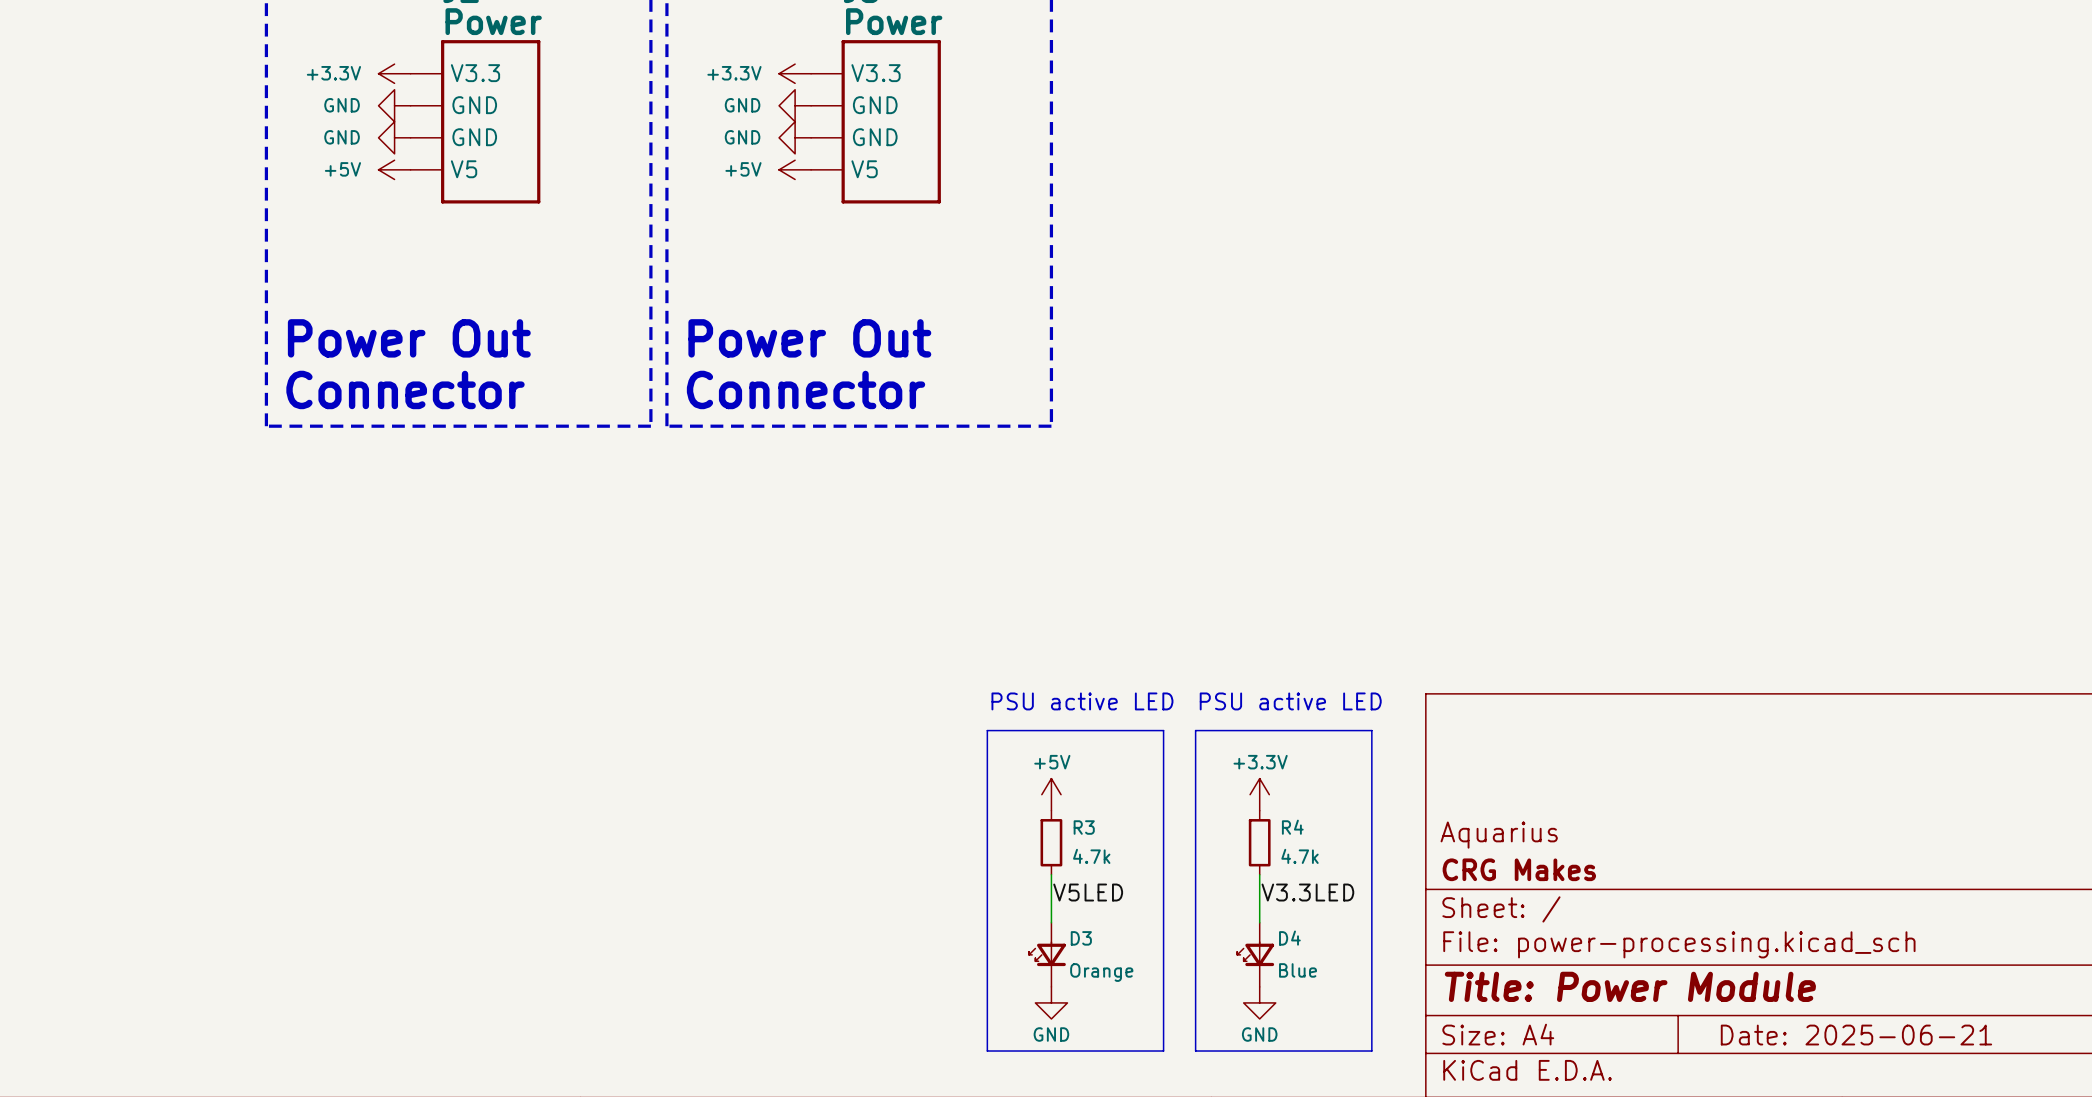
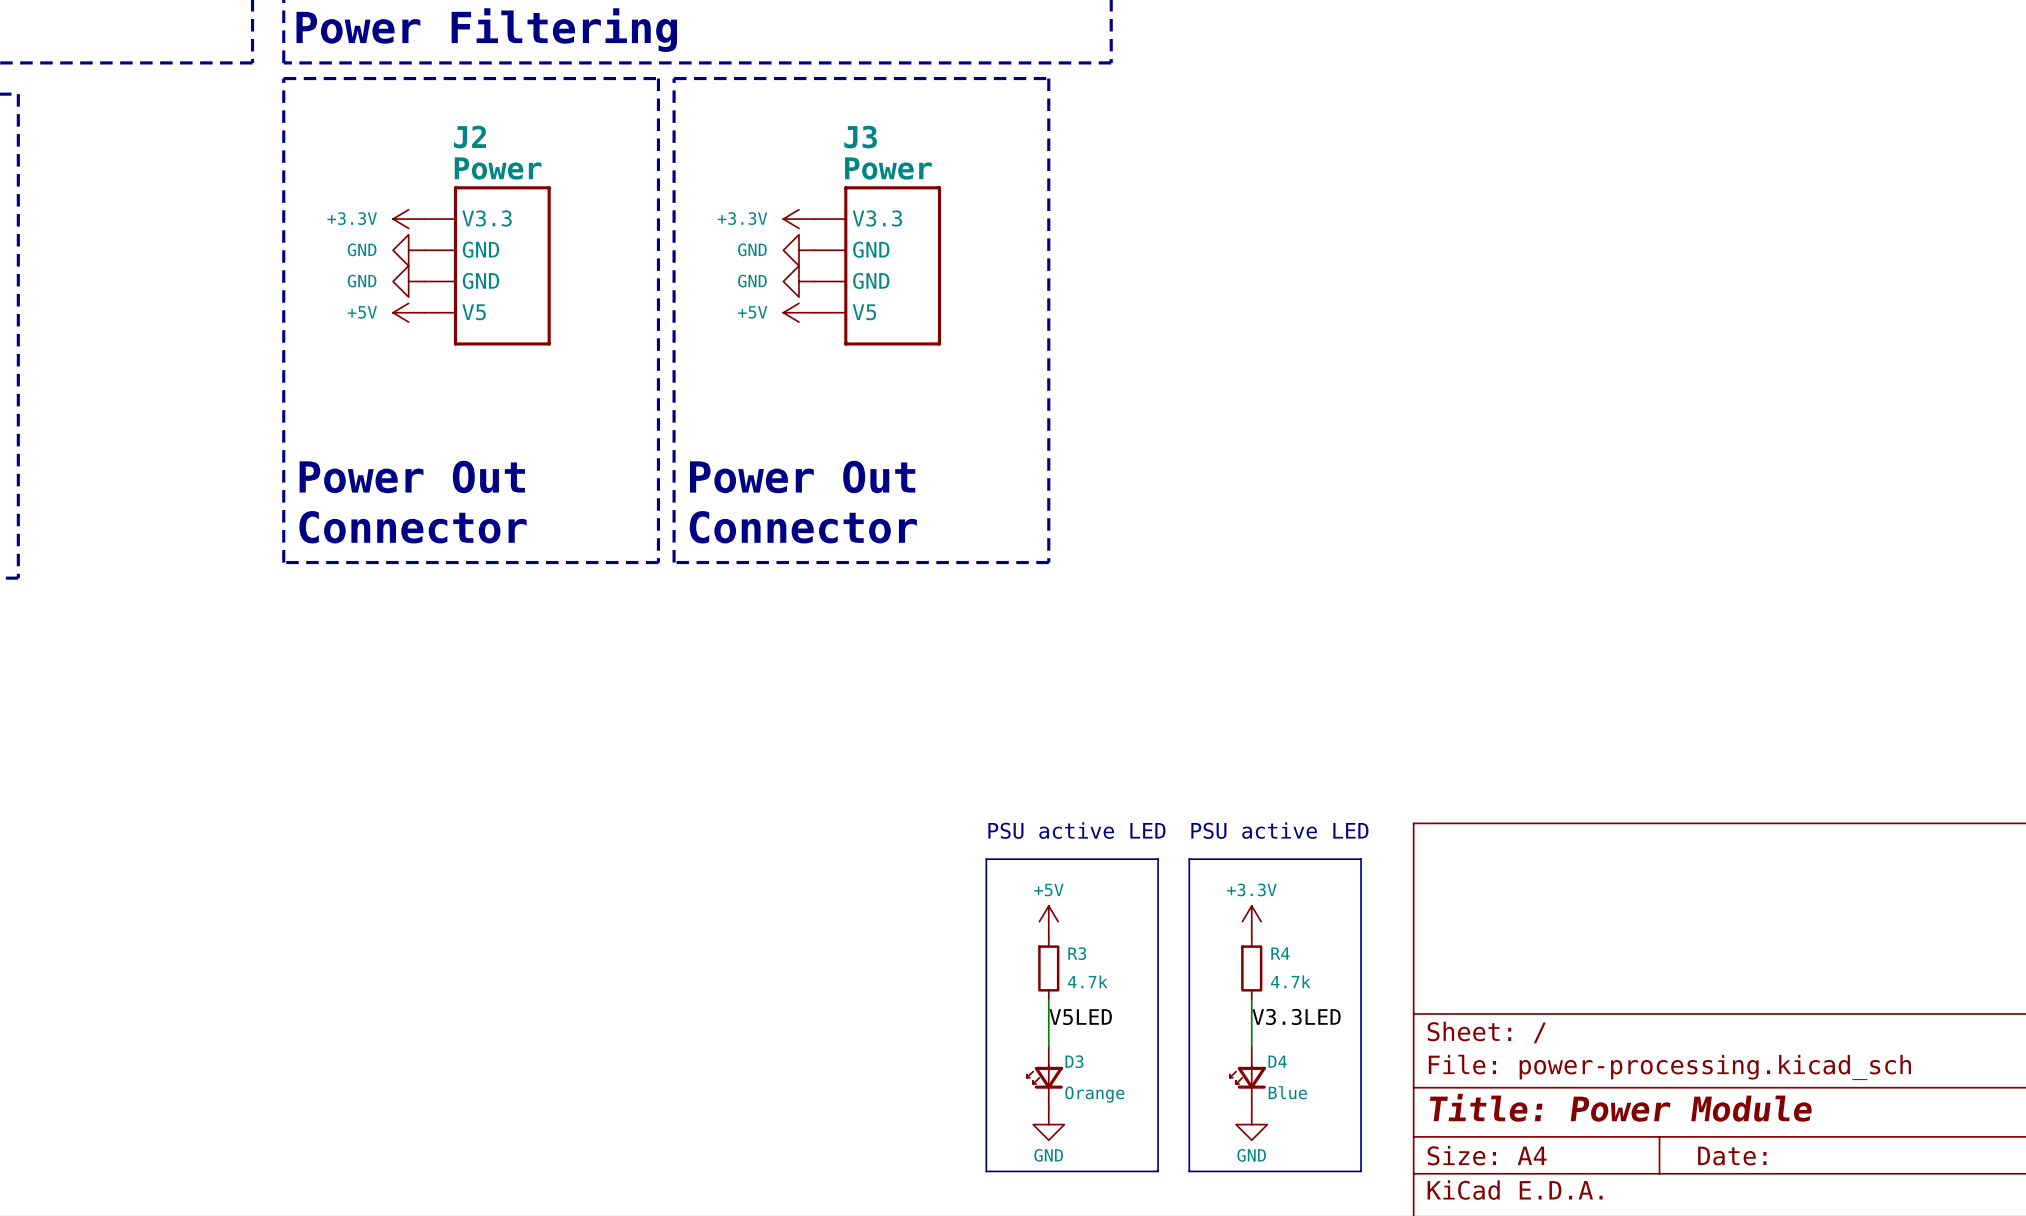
title block: Aquarius (1499, 835) -> none
title block: CRG Makes (1519, 869) -> none
title block: Date: 2025-06-21 (1856, 1035) -> Date: (1732, 1156)

